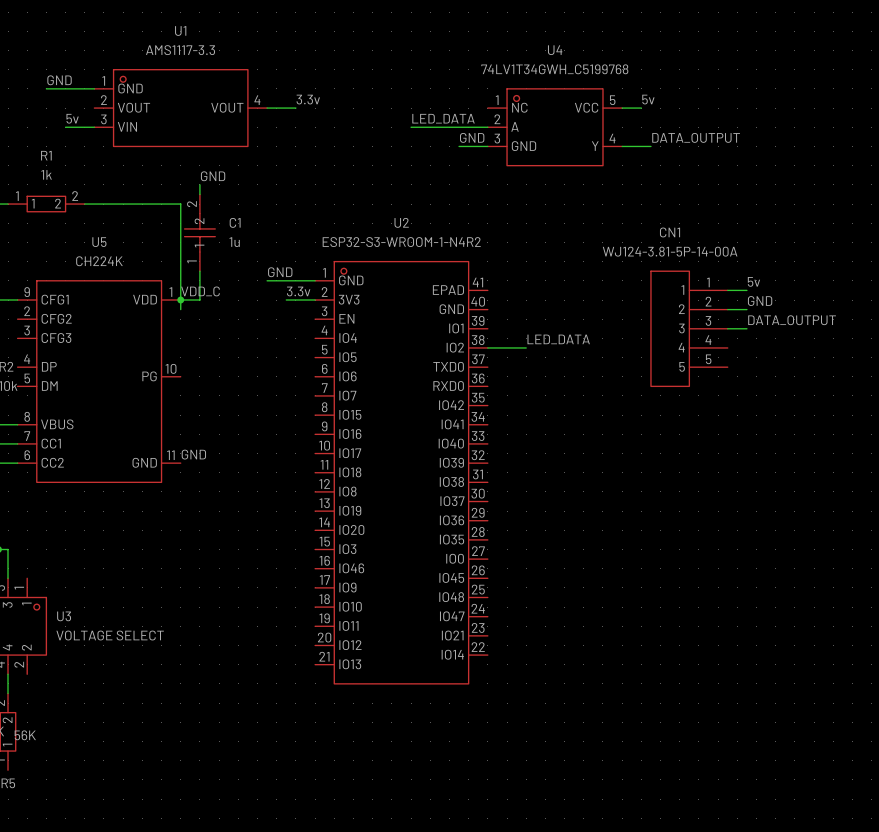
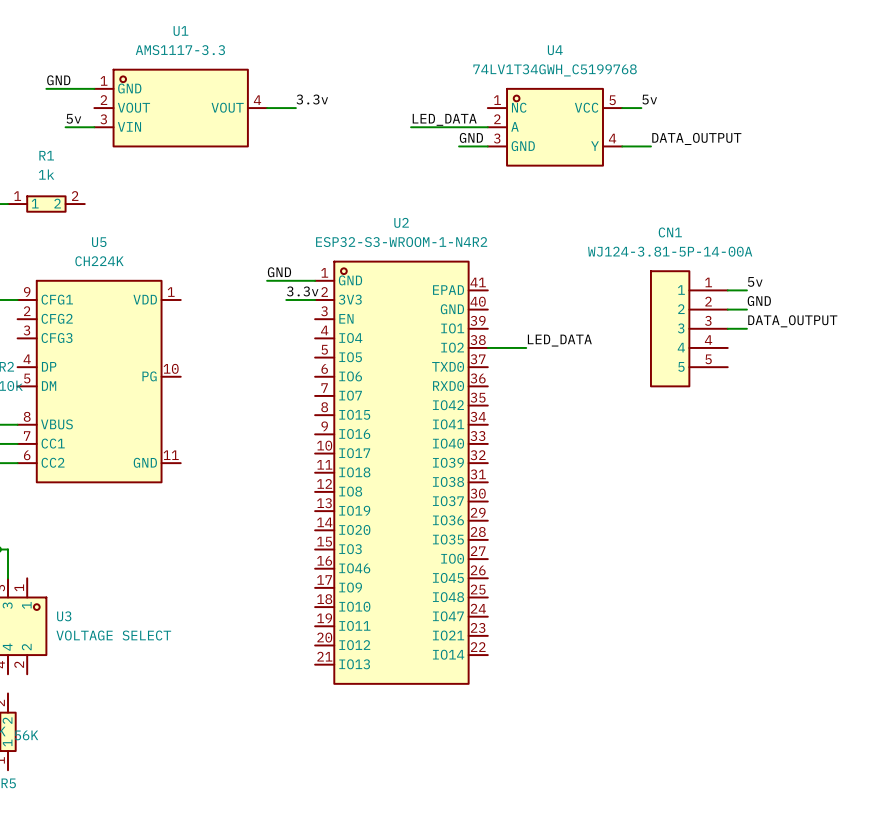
label: GND (213, 176) -> none
wire: (199, 184) (199, 194) -> none
wire: (84, 204) (180, 204) (180, 309) -> none
C1: 1u (199, 232) -> none
wire: (199, 271) (199, 300) (180, 300) -> none
label: VDD_C (200, 291) -> none
junction: (180, 300) -> none
label: GND (193, 454) -> none
wire: (8, 674) (8, 693) -> none

